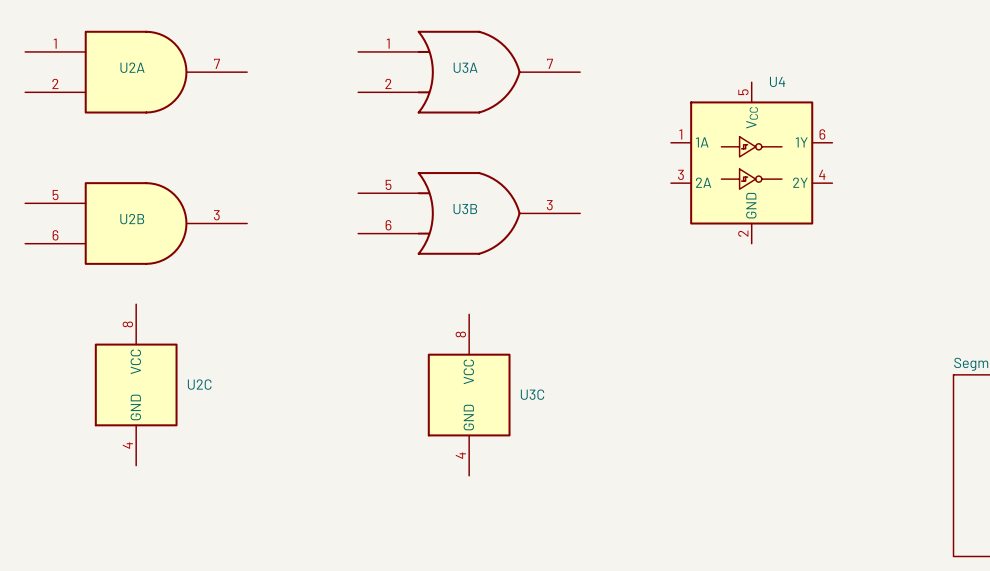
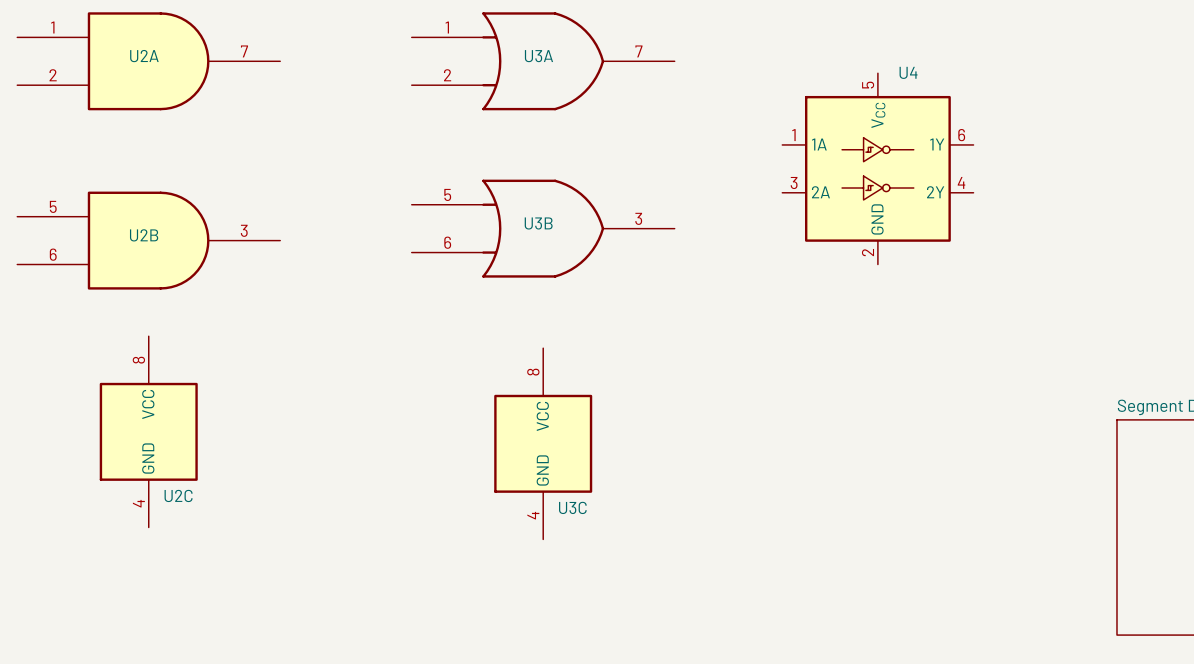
U2C name position: U2C (199, 384) -> U2C (178, 495)
U3C name position: U3C (532, 394) -> U3C (572, 507)

